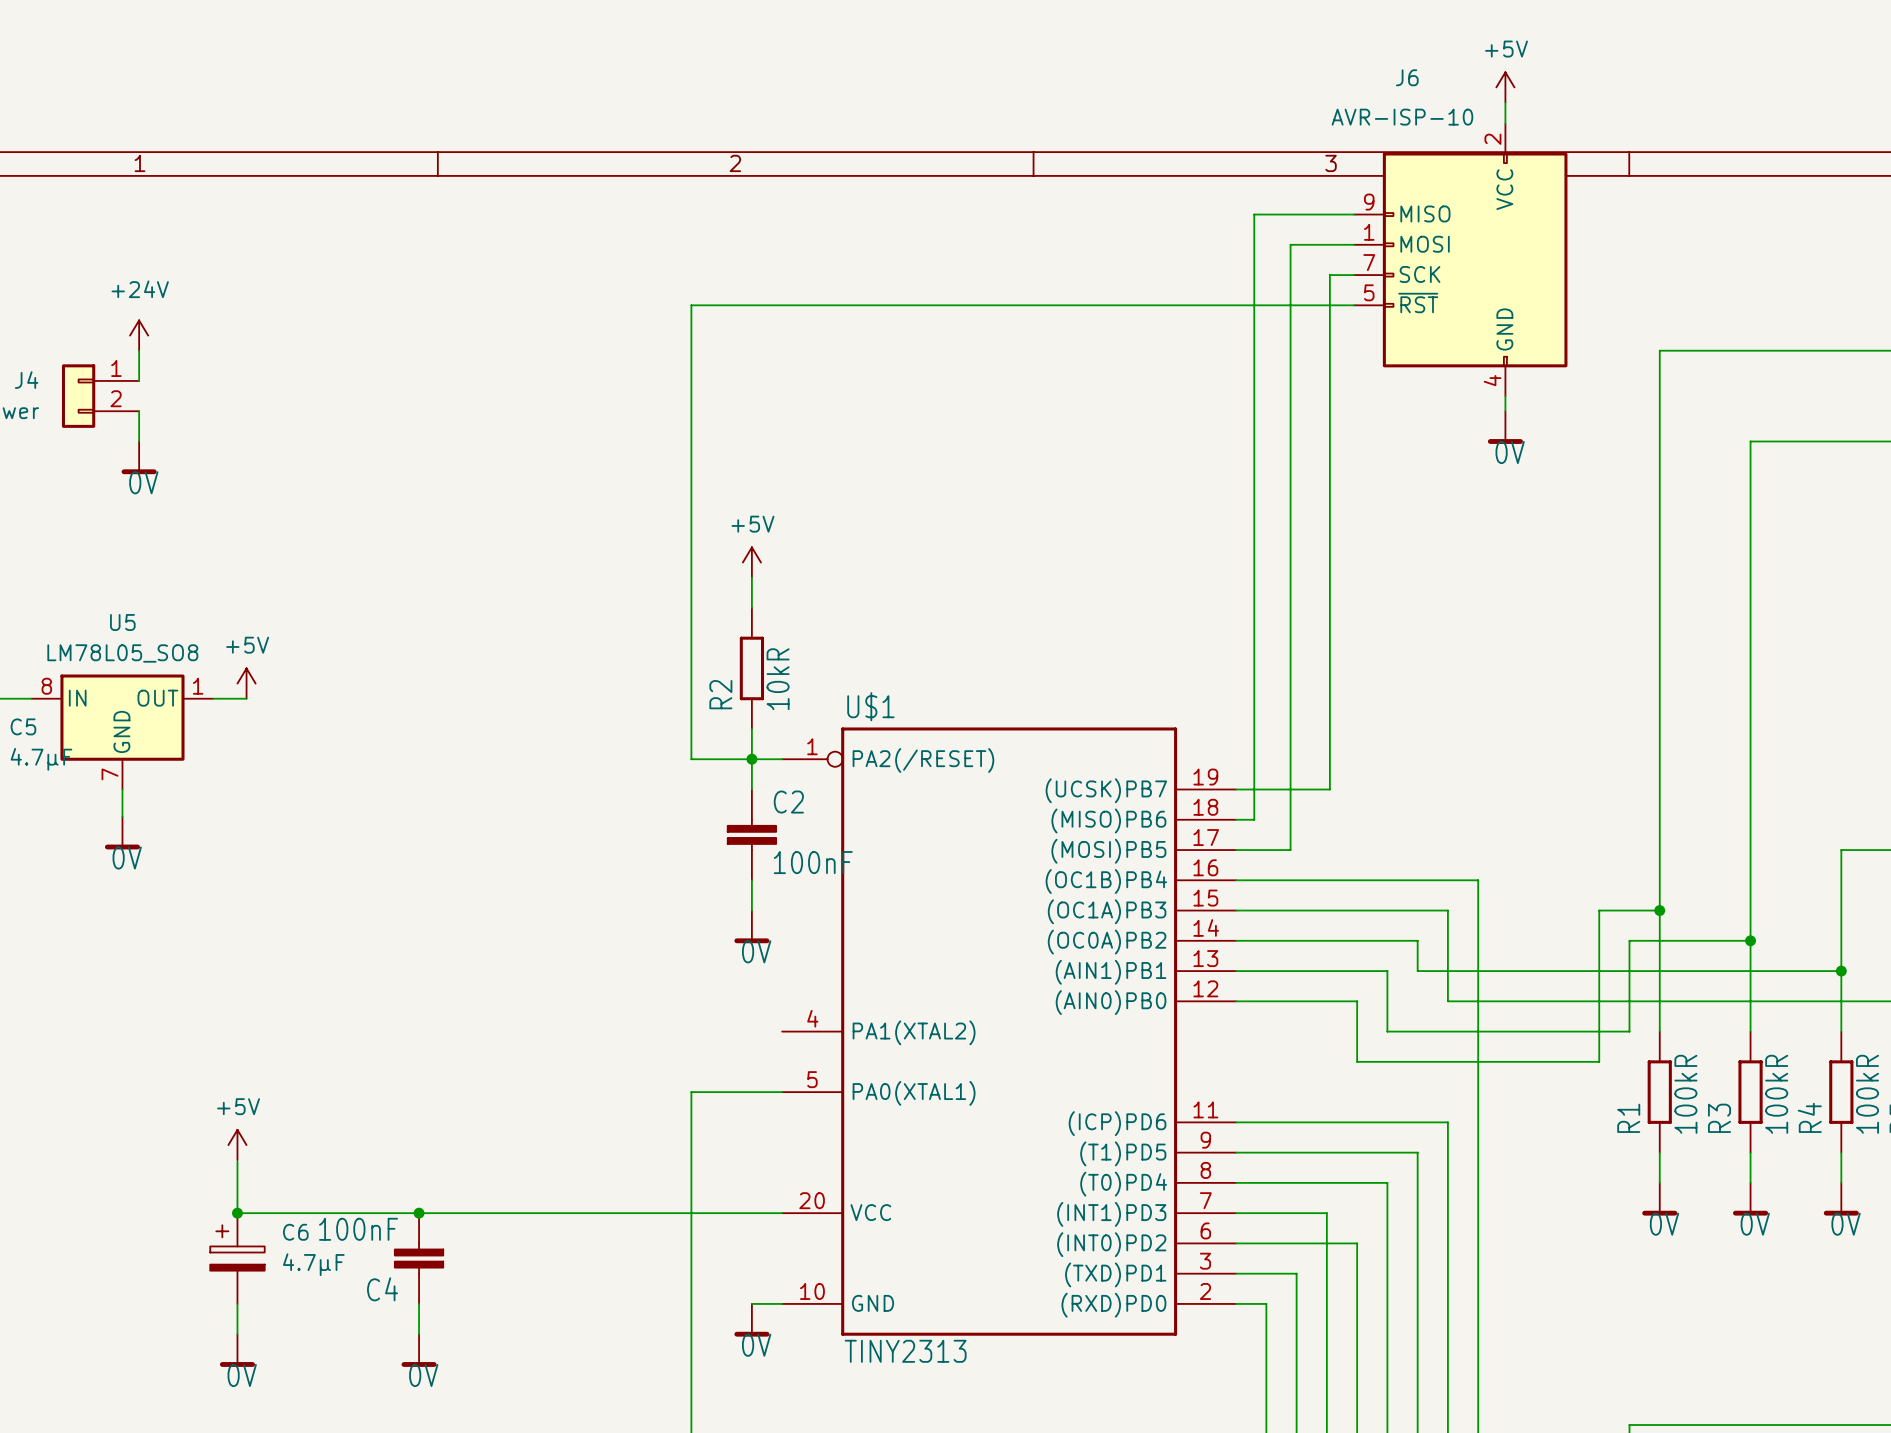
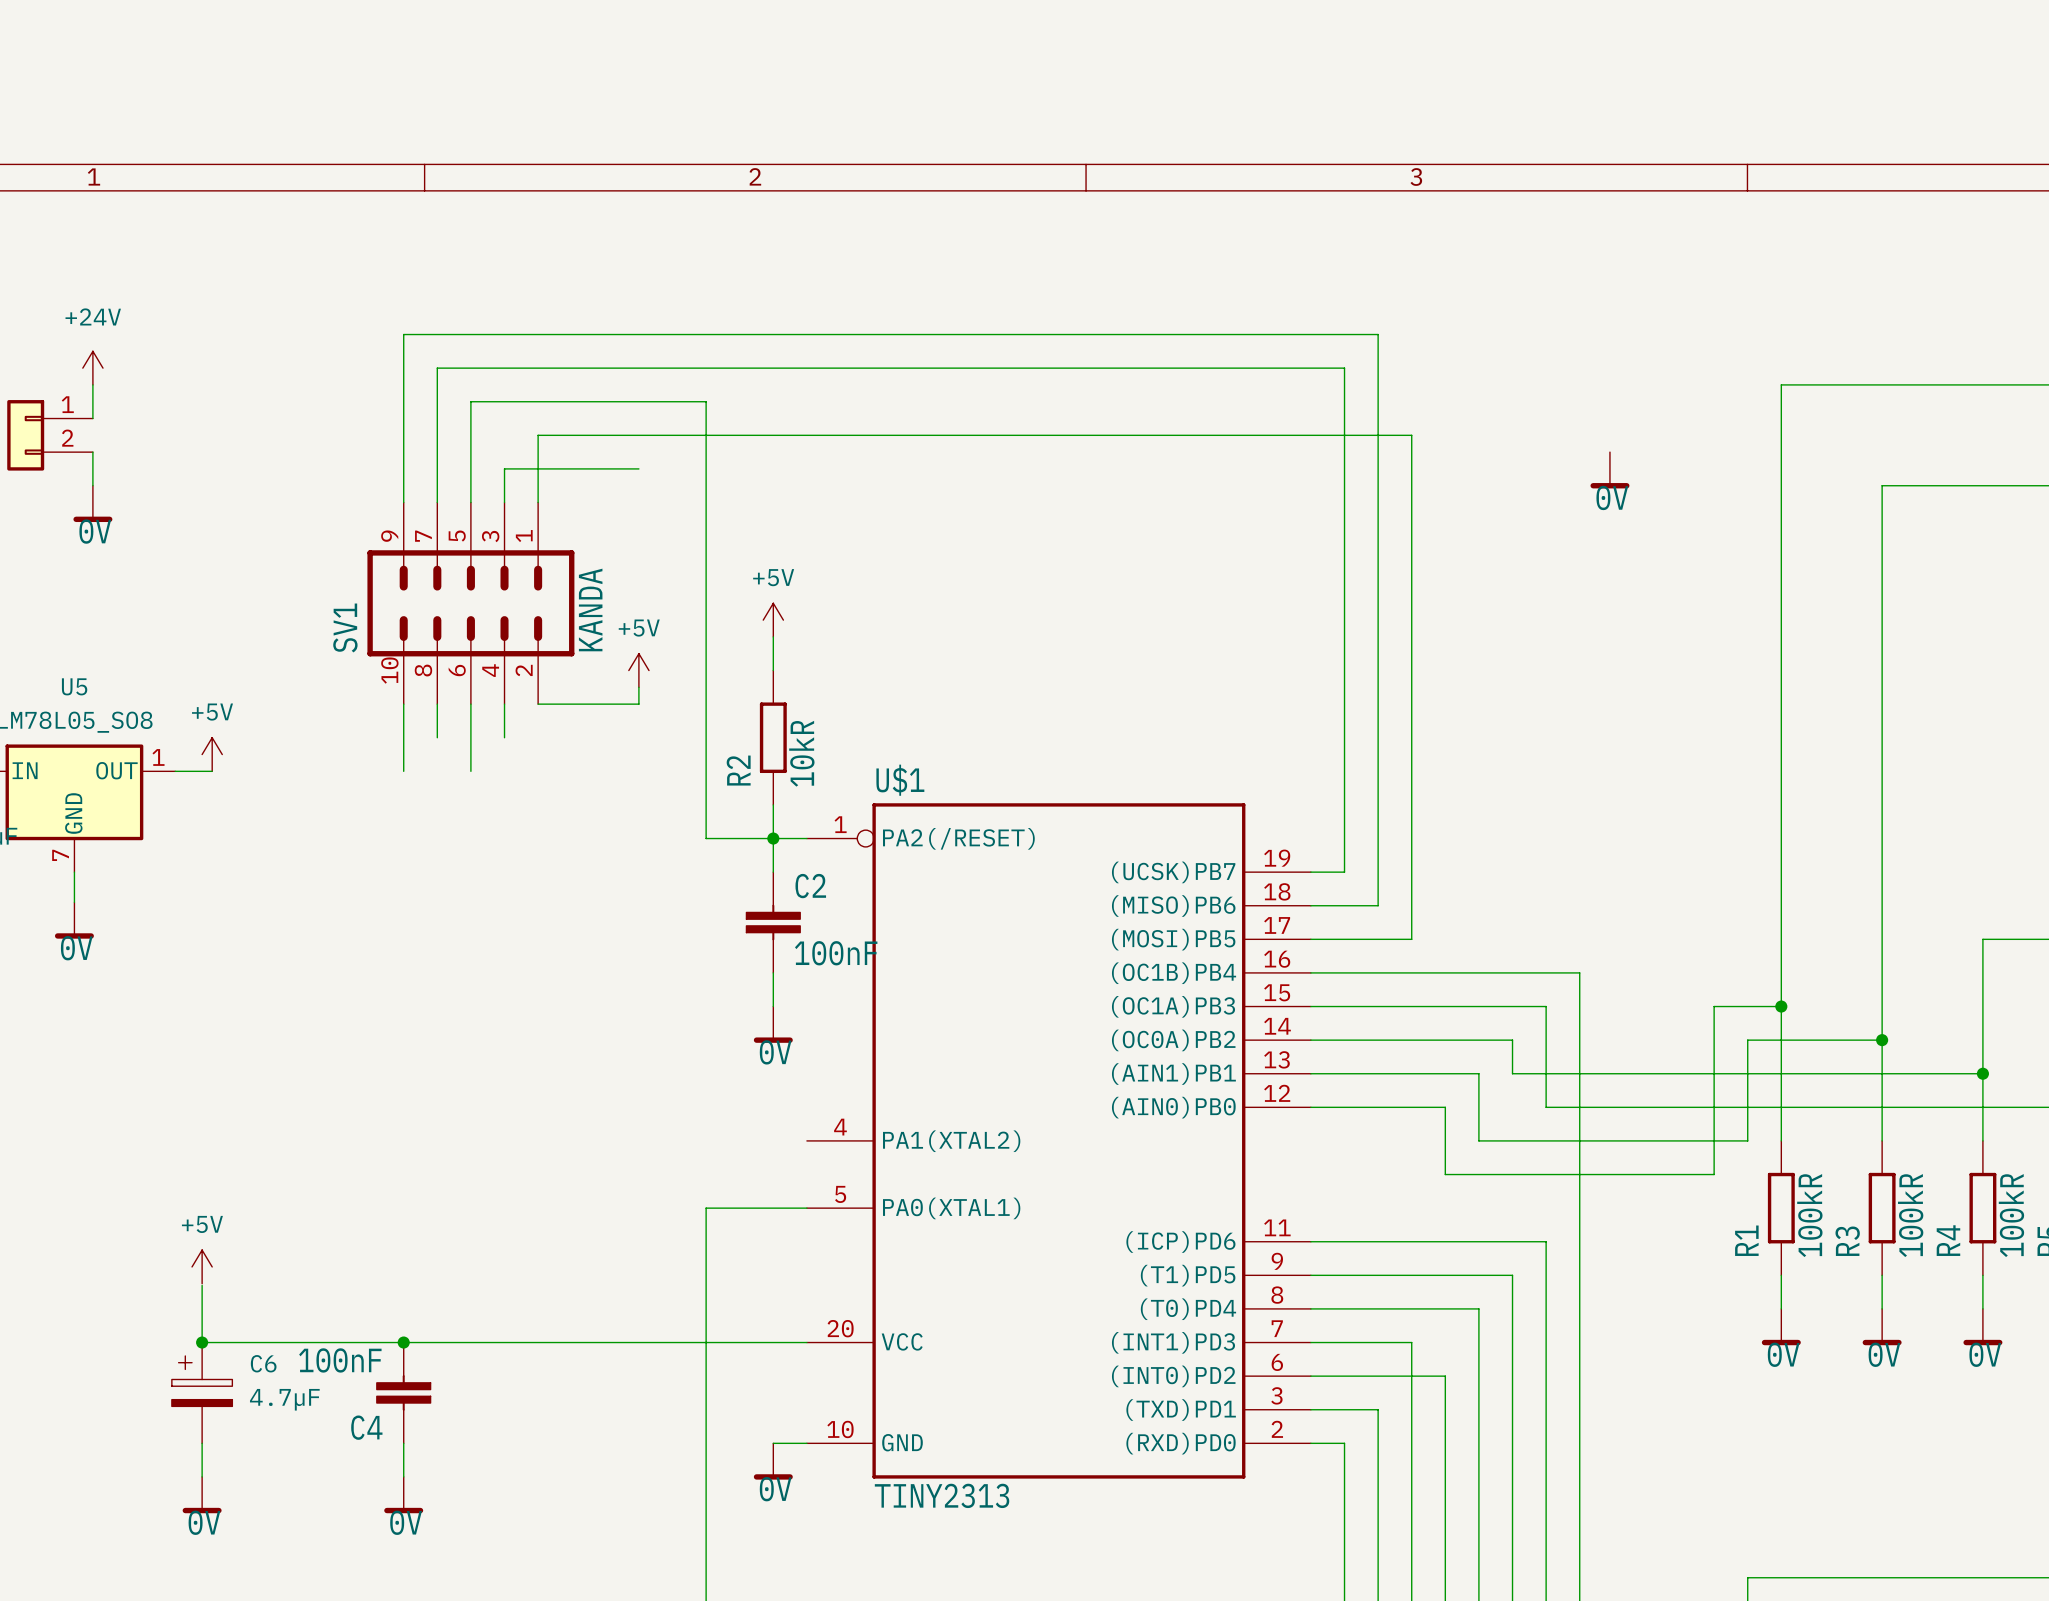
power symbol: +5V (1505, 87) -> none
wire: (1505, 102) (1505, 123) -> none
wire: (1354, 214) (1254, 214) (1254, 819) -> (1378, 334) (1378, 905) (1331, 905)
wire: (1354, 244) (1290, 244) (1290, 850) -> (538, 502) (538, 435) (1411, 435) (1411, 939) (1371, 939)
J6: AVR-ISP-10 (1460, 259) -> none
wire: (1354, 275) (1329, 275) (1329, 789) (1266, 789) -> (437, 502) (437, 368) (1344, 368) (1344, 872)
wire: (691, 305) (691, 365) -> (470, 502) (470, 401) (706, 401)
wire: none -> (706, 334) (403, 334) (403, 502)
wire: (1296, 305) (1354, 305) -> none
wire: (1505, 396) (1505, 411) -> none
wire: none -> (638, 468) (504, 468) (504, 502)
SV1: none -> KANDA (470, 603)
power symbol: none -> +5V (638, 670)
wire: none -> (638, 687) (638, 704) (538, 704)
wire: none -> (403, 704) (403, 771)
wire: none -> (437, 704) (437, 737)
wire: none -> (470, 704) (470, 771)
wire: none -> (504, 704) (504, 737)

